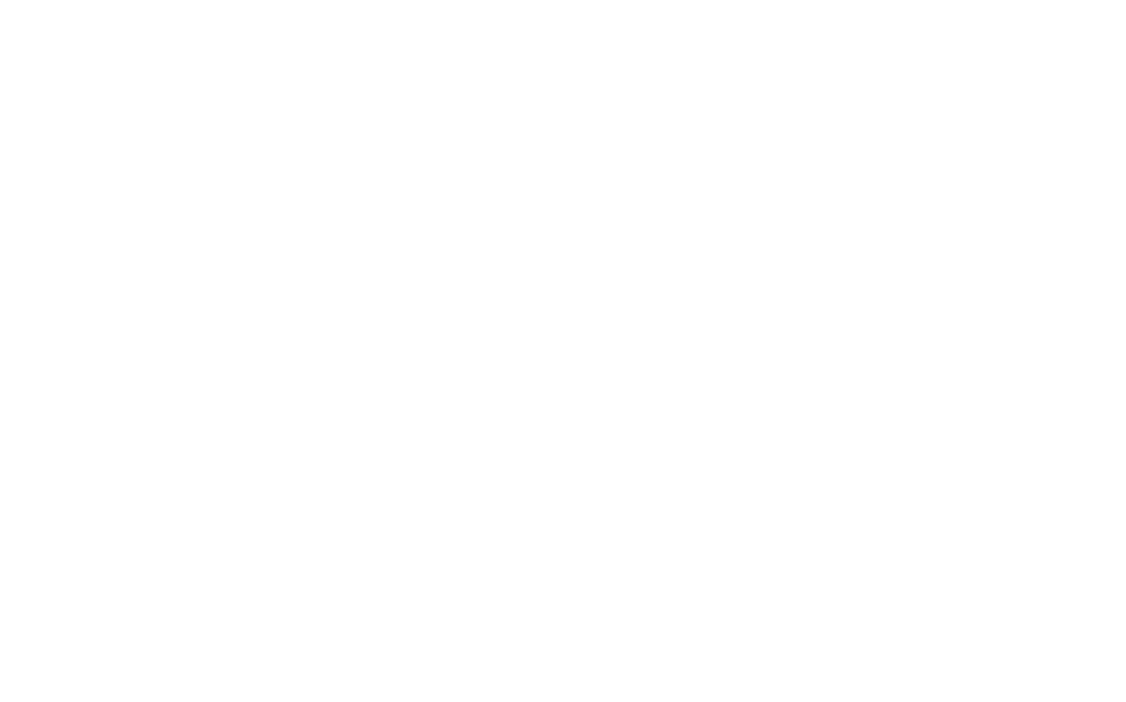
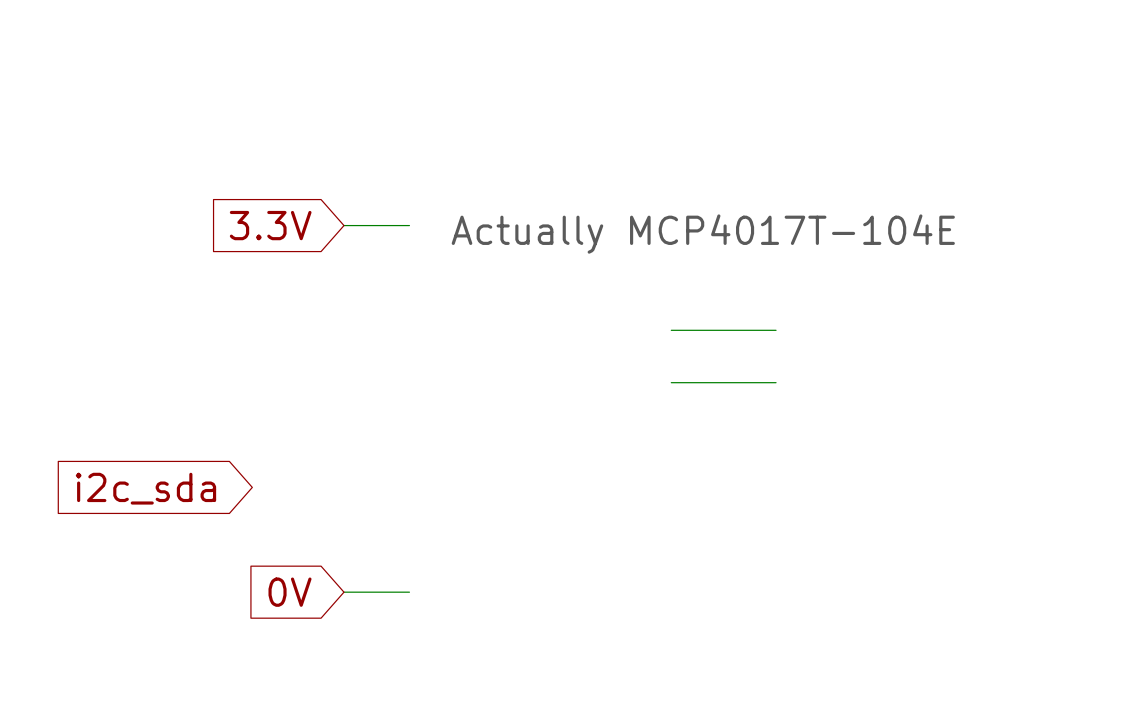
global label: none -> 3.3V (270, 225)
wire: none -> (343, 225) (409, 225)
text: none -> Actually MCP4017T-104E (703, 234)
wire: none -> (671, 330) (776, 330)
wire: none -> (671, 382) (776, 382)
global label: none -> i2c_sda (145, 488)
global label: none -> 0V (290, 592)
wire: none -> (343, 592) (409, 592)

